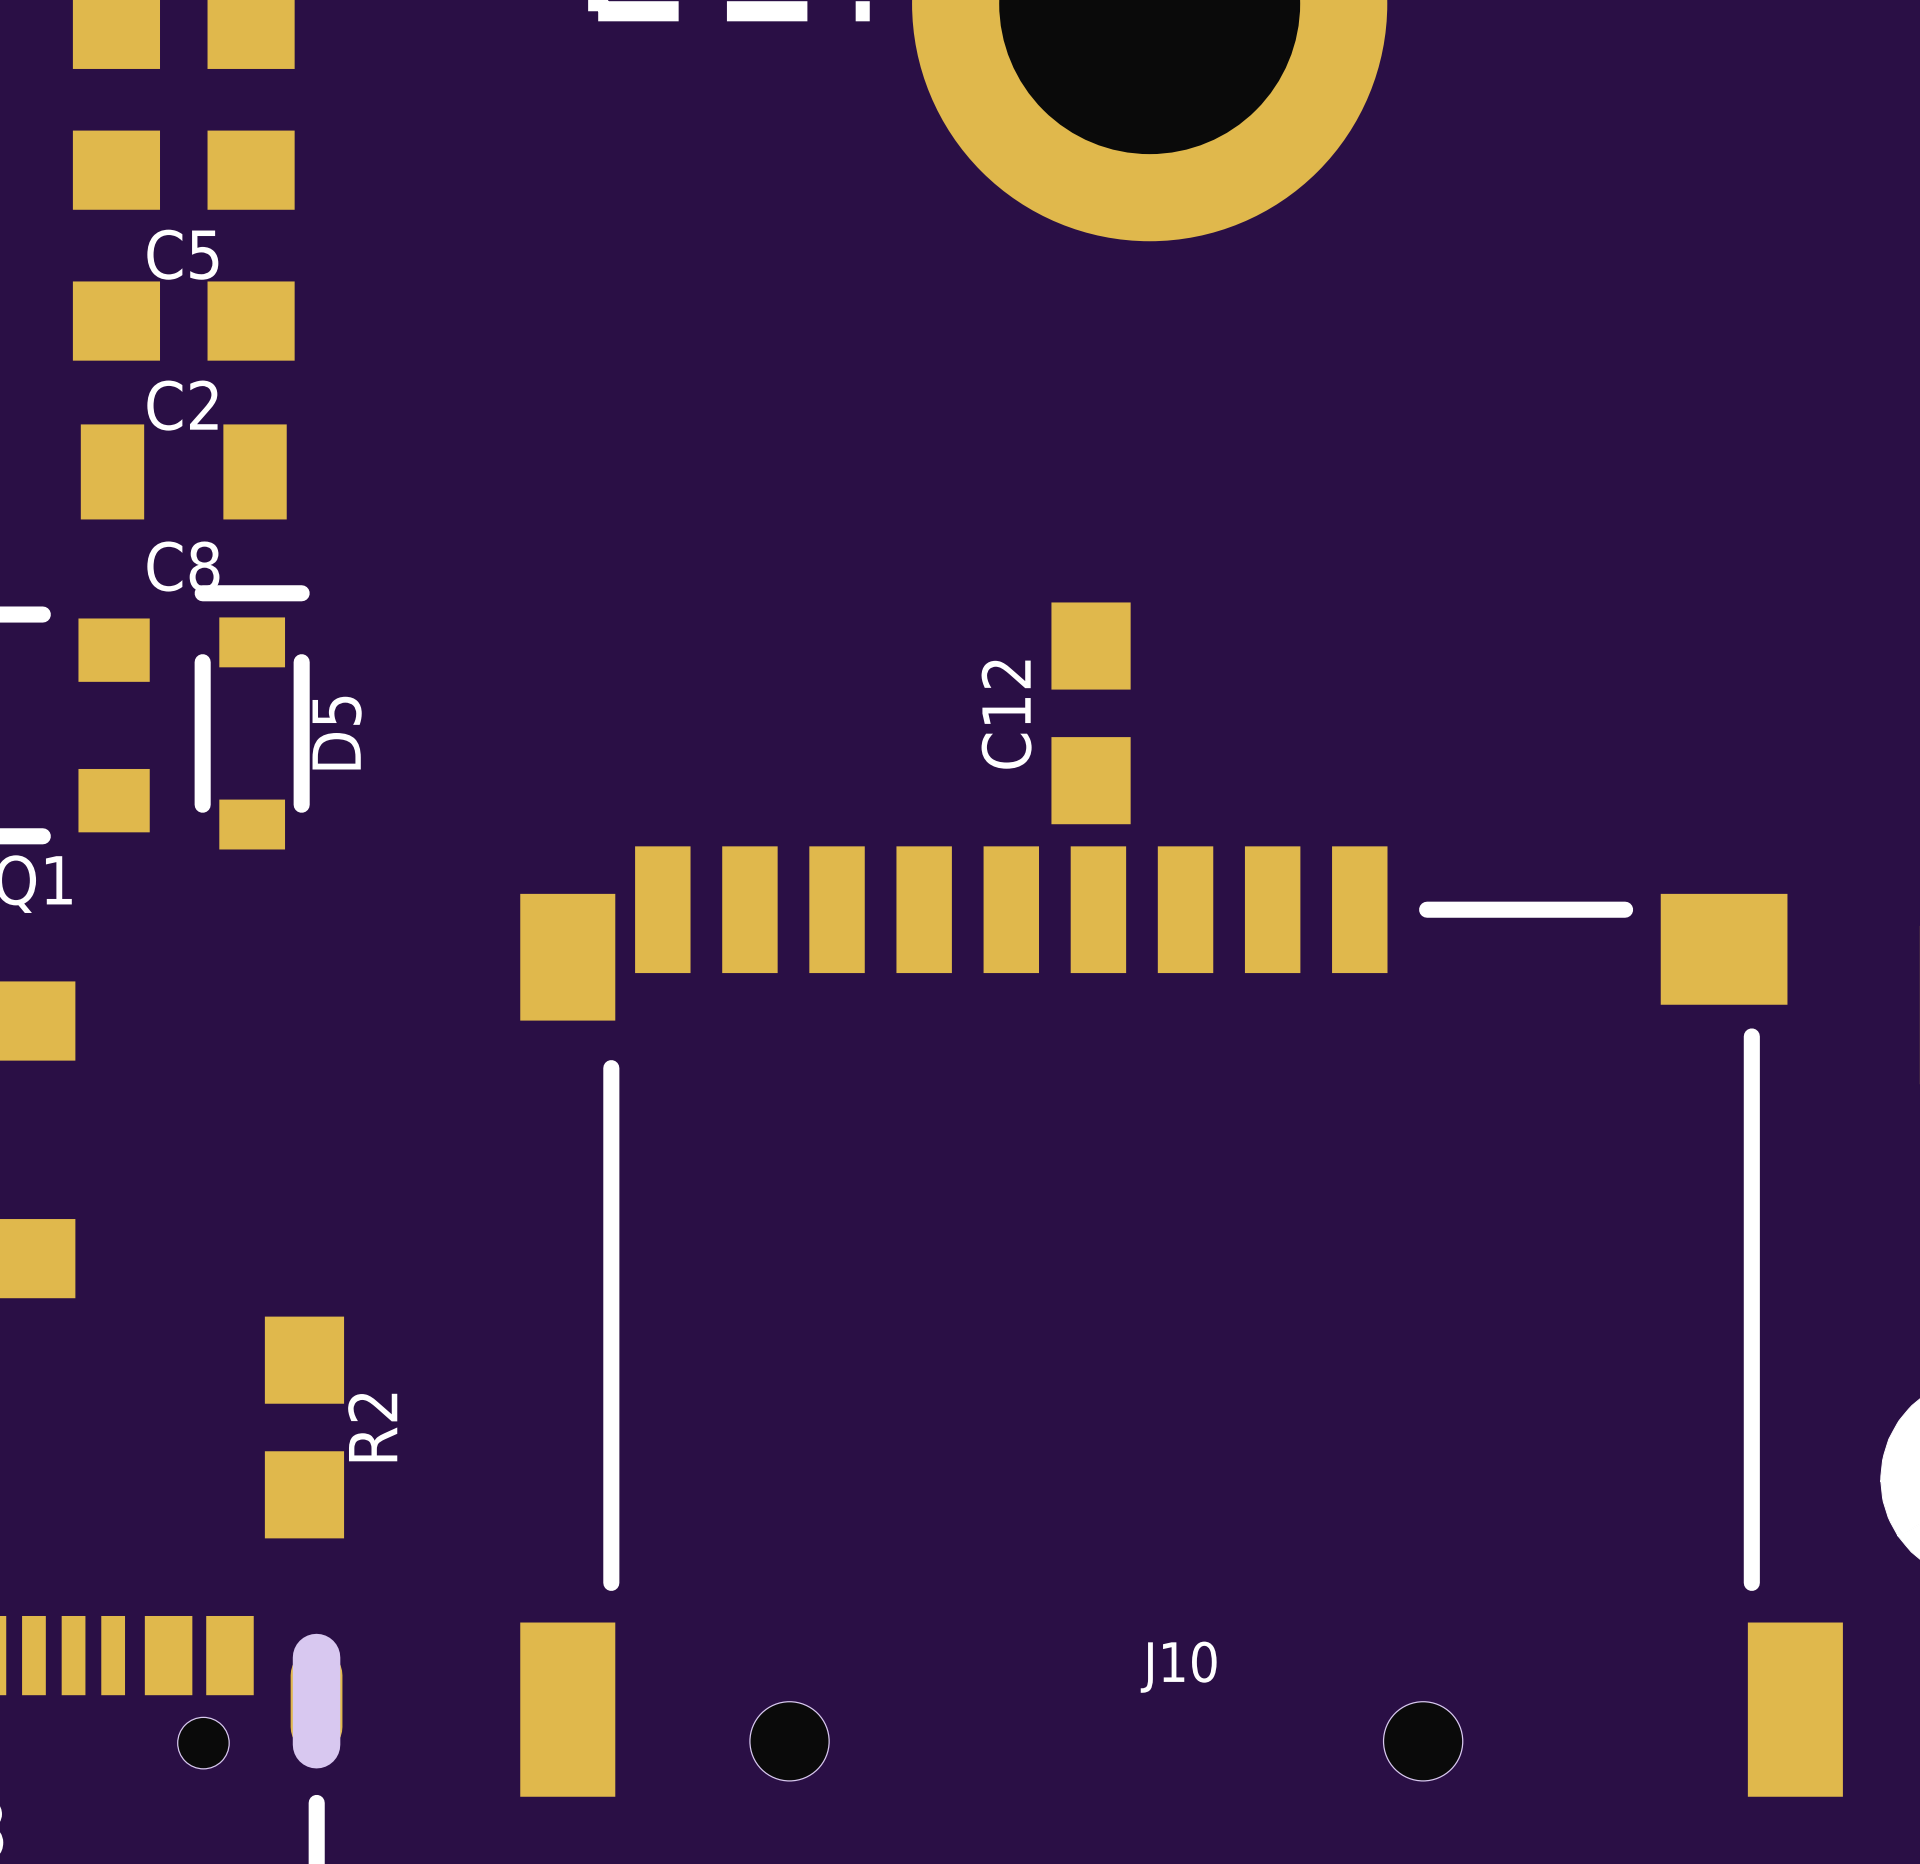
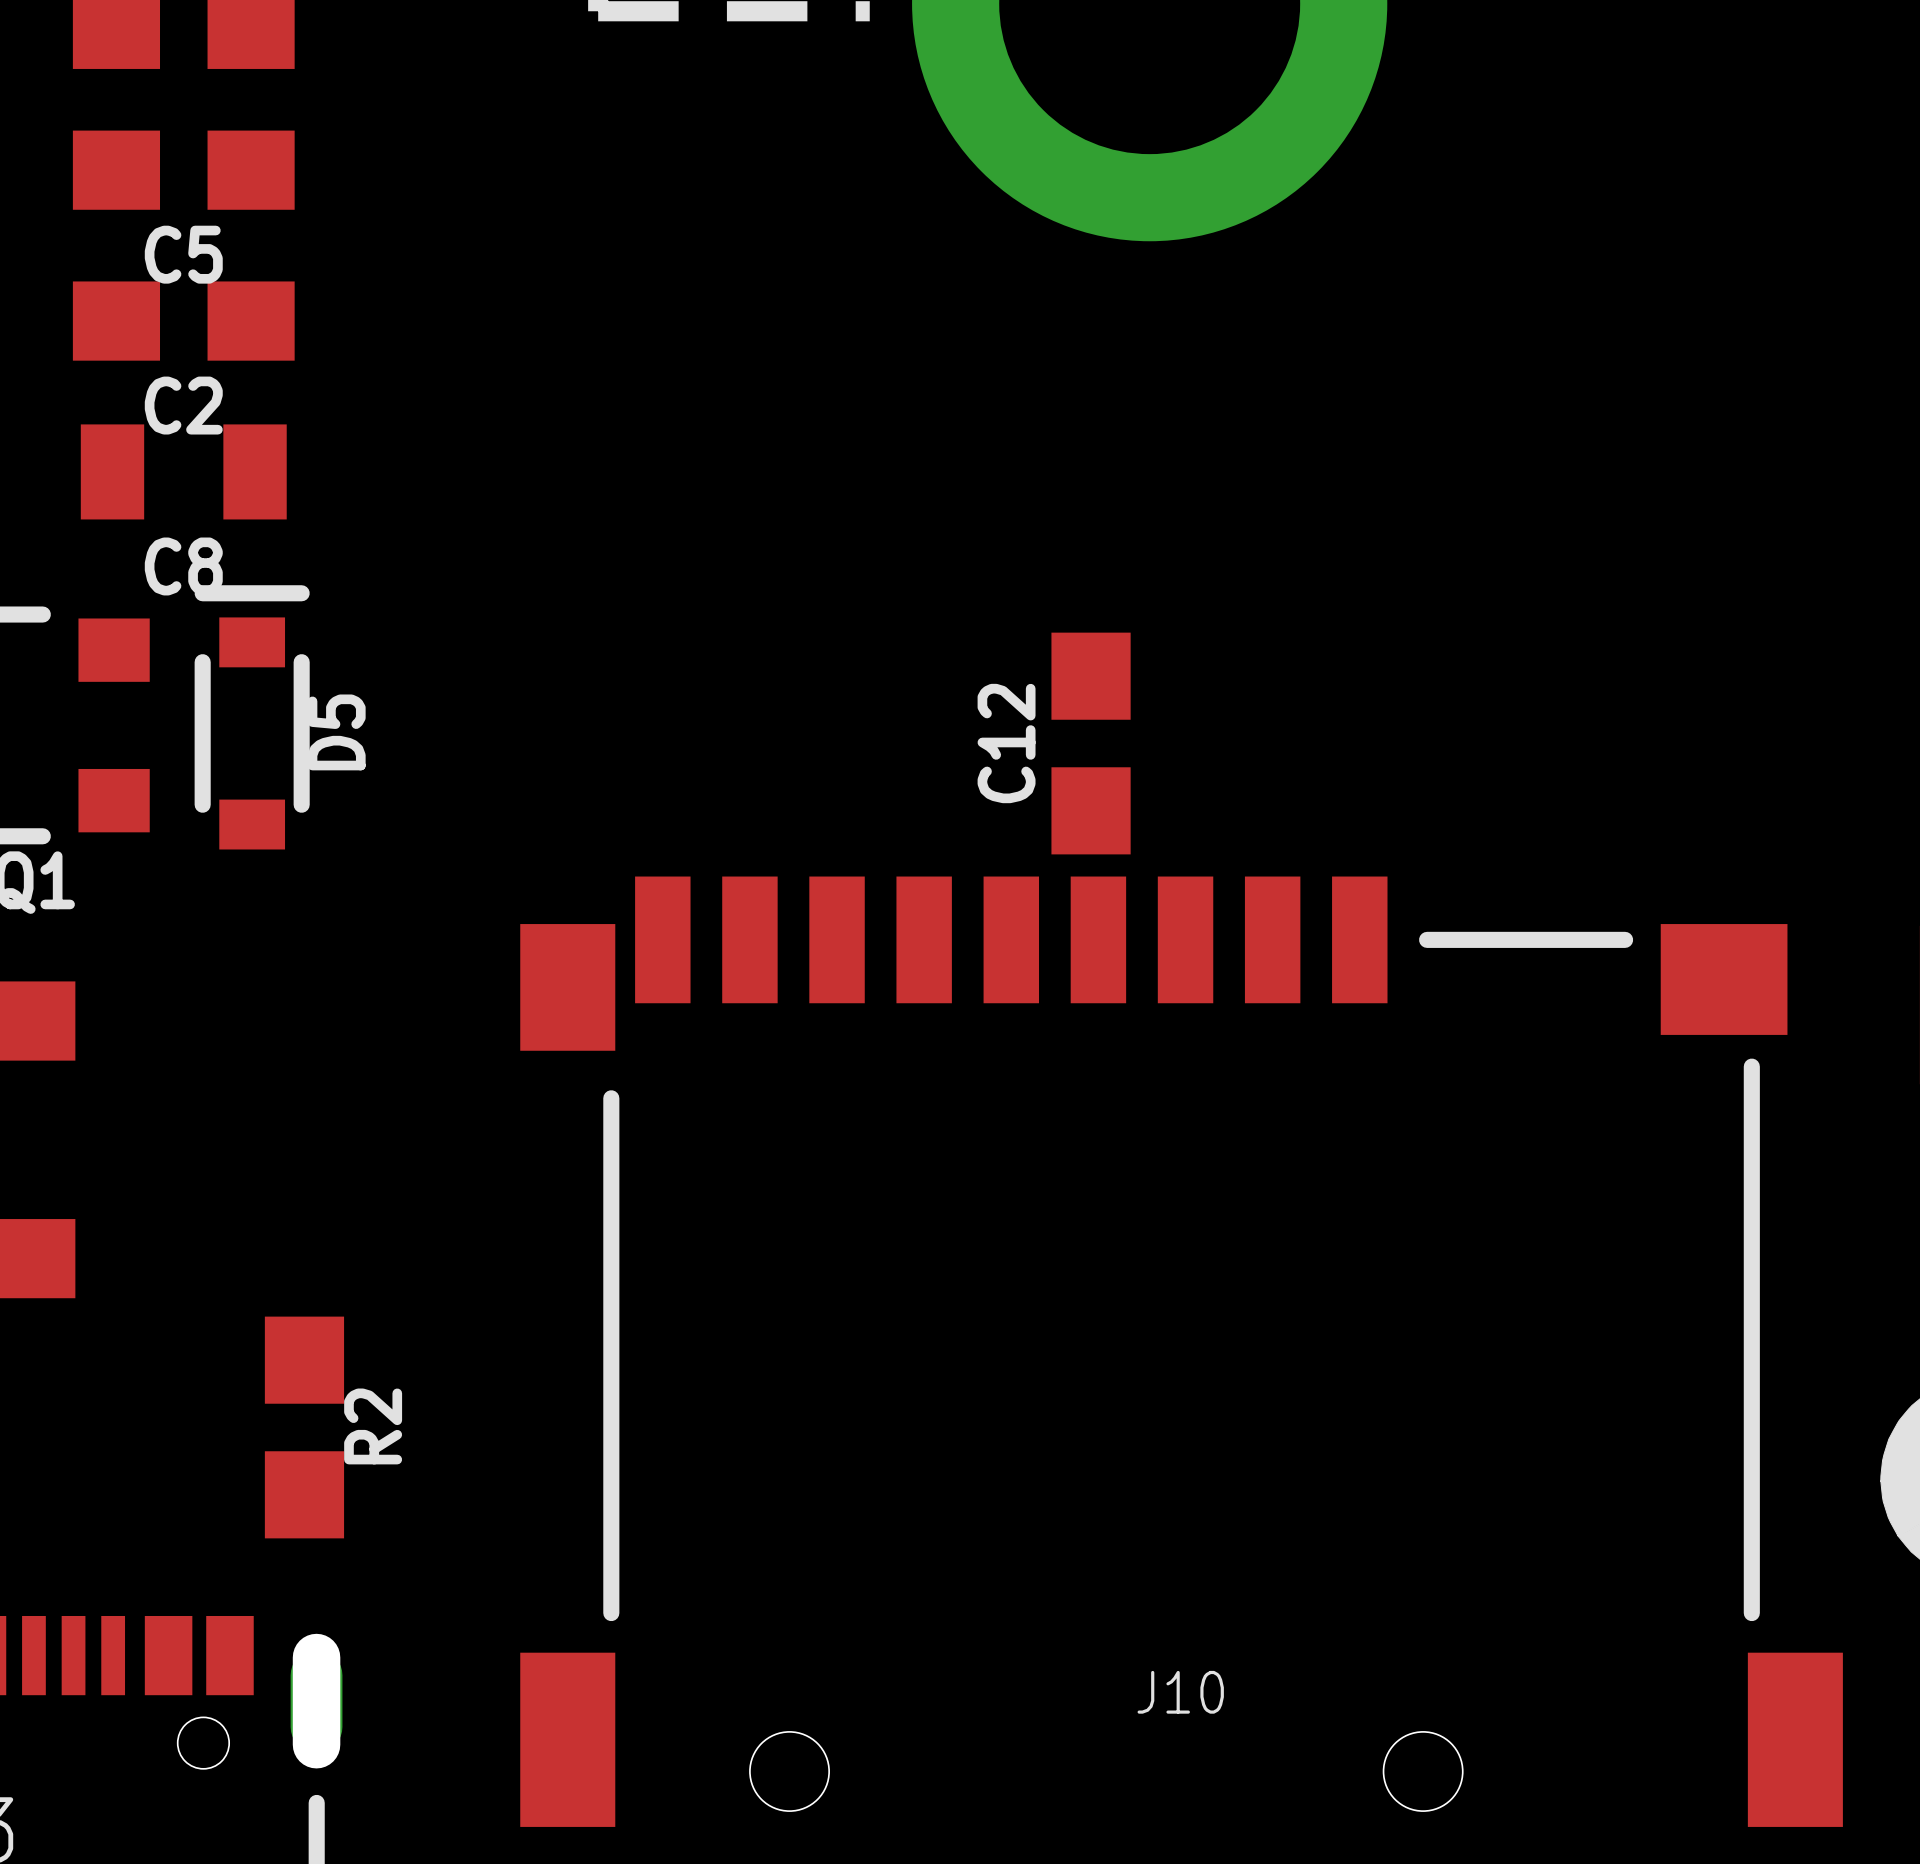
C12 position: (1091, 713) -> (1091, 743)
J10 position: (1181, 1321) -> (1181, 1351)

